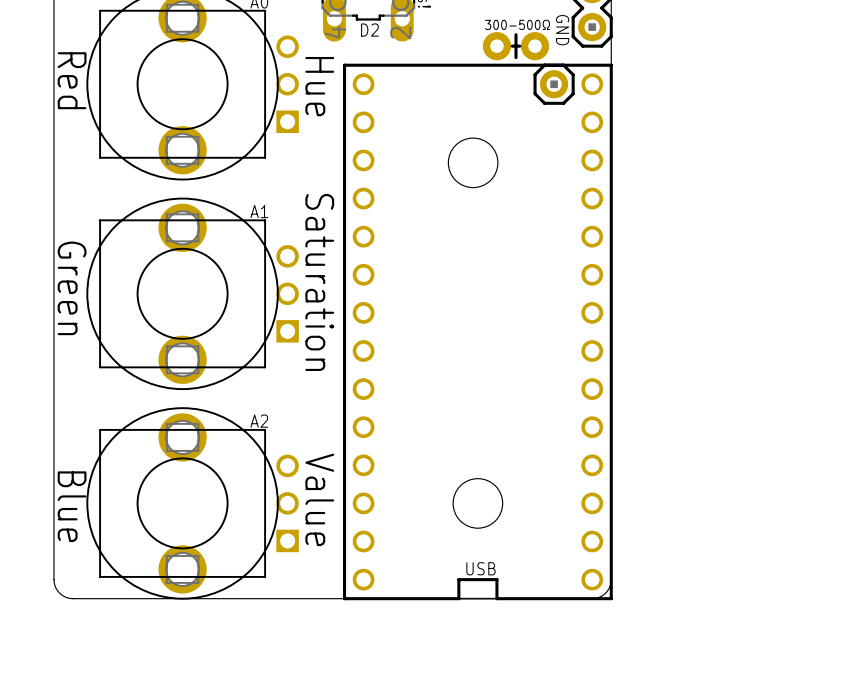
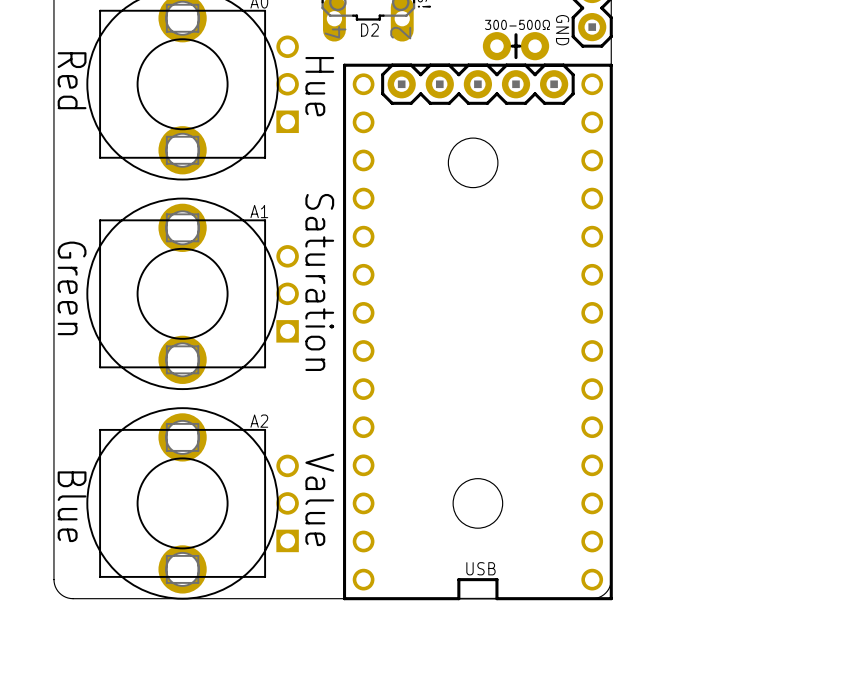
part: none -> (477, 84)
part: (554, 84) -> none

